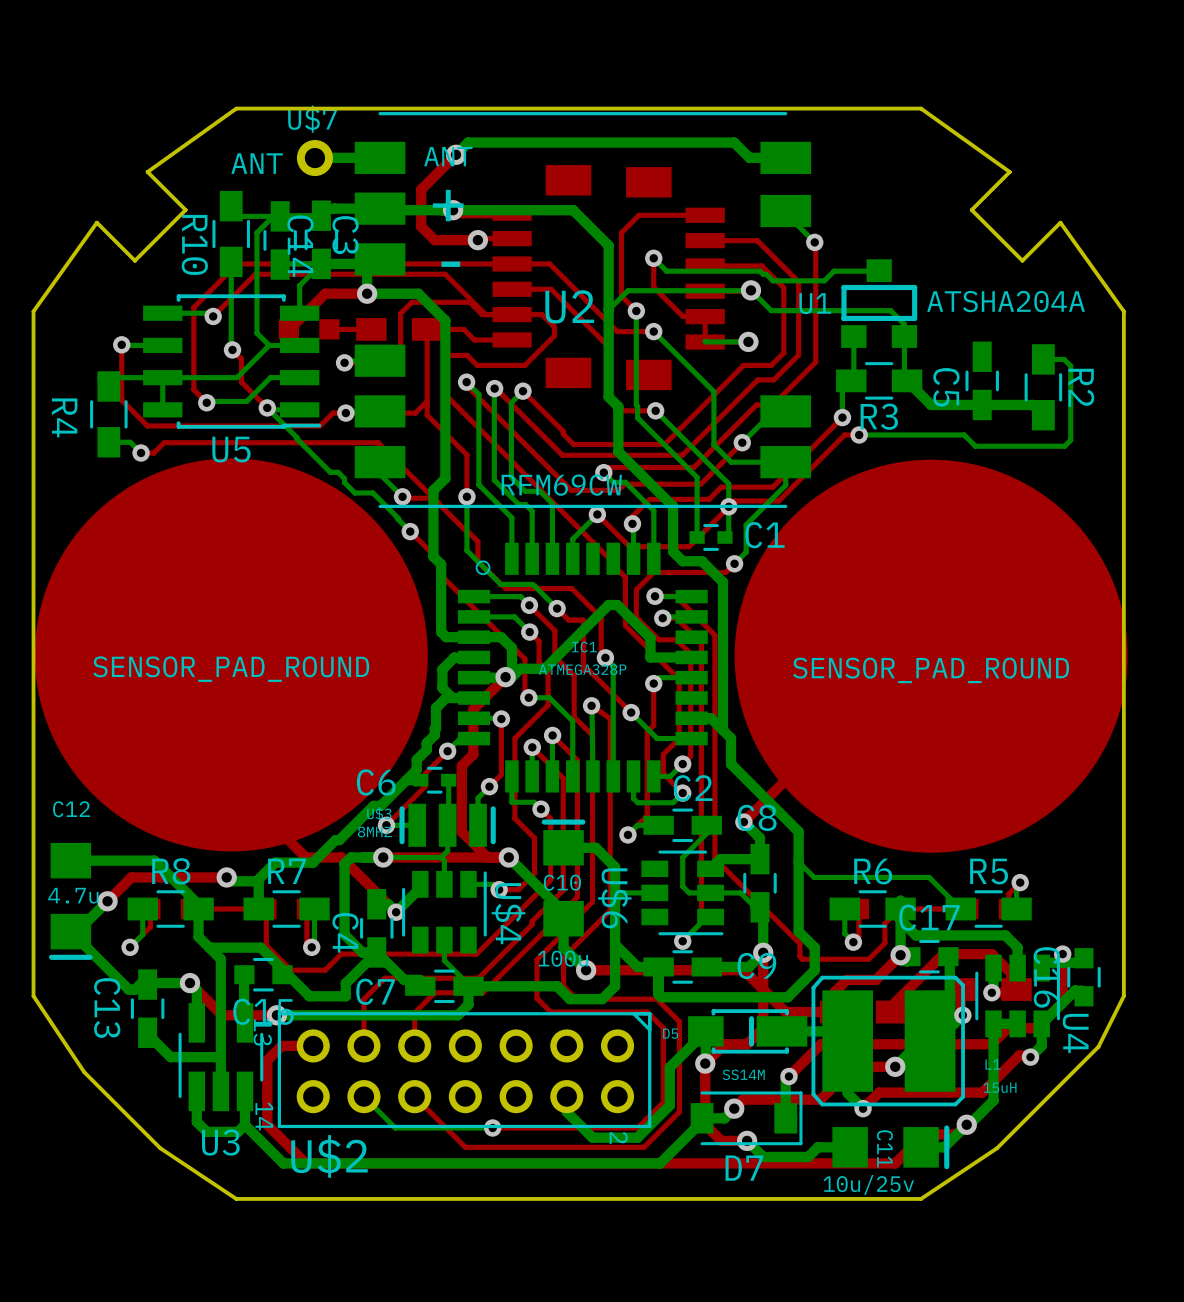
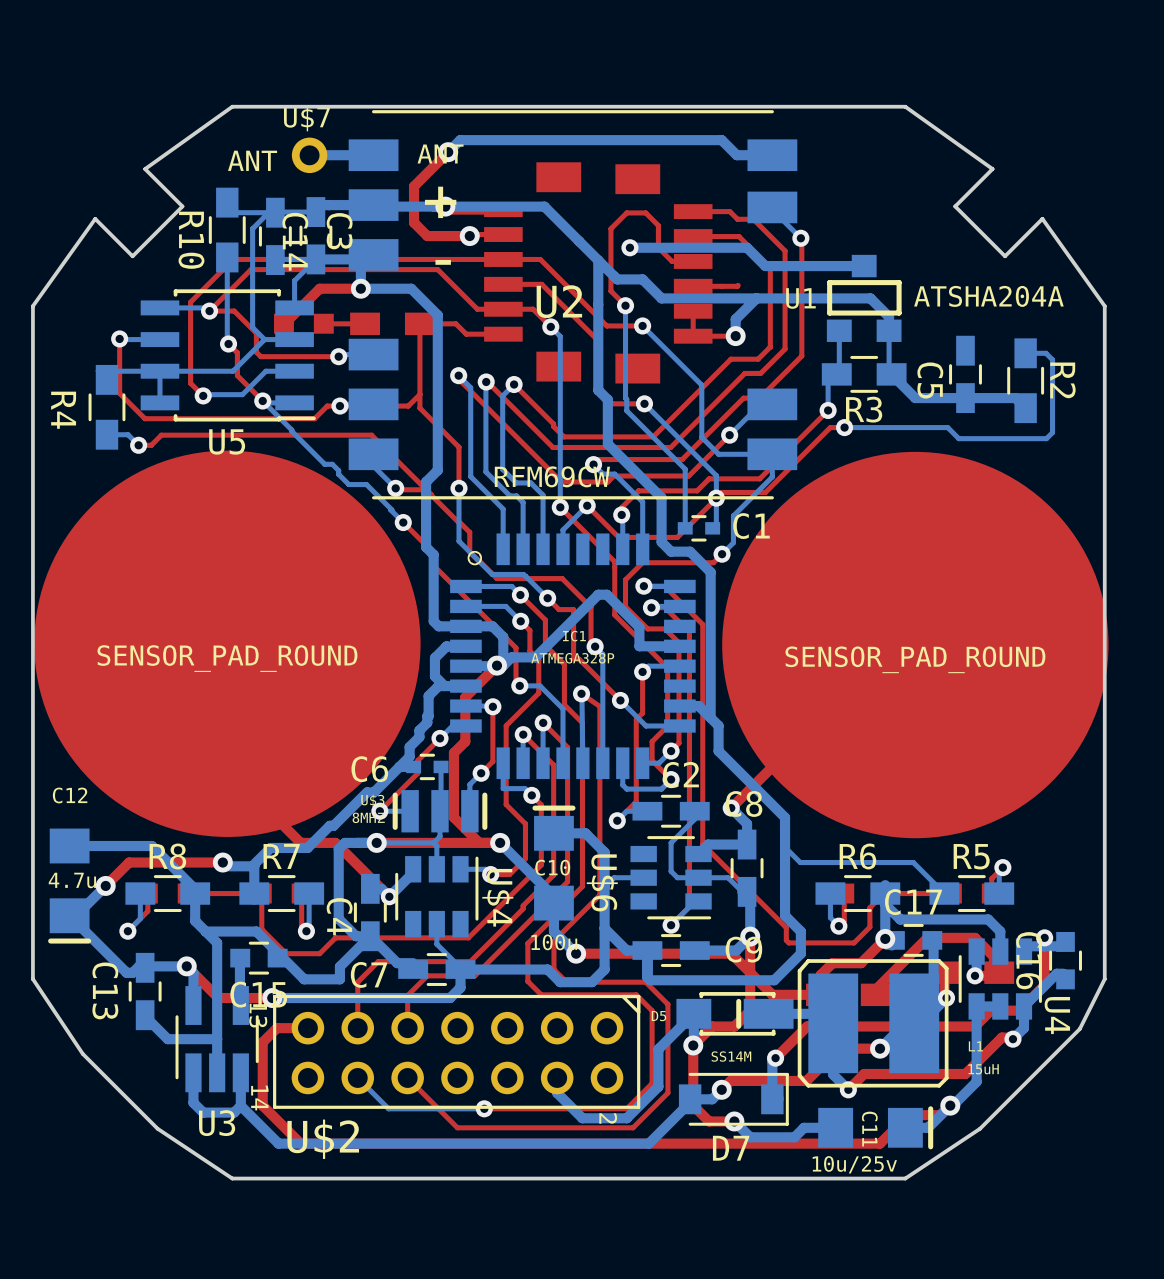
bottom track: (553, 210) (573, 210) (608, 245) (608, 268) -> none
top track: (705, 215) (637, 216) -> (693, 261) (672, 261) (658, 247) (658, 225) (645, 212) (626, 212)
top track: (751, 240) (757, 240) (798, 282) -> (693, 211) (729, 211) (737, 219) (753, 219) (785, 250) (785, 277)
bottom track: (653, 258) (666, 271) (760, 271) (772, 280) (824, 280) (834, 271) (879, 271) -> (629, 247) (747, 247) (765, 266) (864, 266)
top track: (653, 258) (653, 287) (682, 316) (705, 316) -> none
via position: (653, 258) -> (629, 247)
top track: (705, 265) (761, 265) (783, 287) (783, 352) -> (739, 236) (770, 267) (770, 347)
bottom track: (749, 290) (771, 310) (890, 310) (904, 324) -> (544, 206) (617, 279) (642, 279) (661, 298) (870, 298) (889, 318)
bottom track: (749, 290) (627, 290) (608, 310) -> none
via: (750, 290) -> none
top track: (485, 314) (482, 314) (469, 302) (411, 302) (400, 313) (400, 348) (385, 362) (344, 362) -> (209, 311) (234, 311) (256, 333) (256, 352) (260, 356) (338, 356)
top track: (542, 314) (554, 327) (554, 335) (524, 365) (477, 365) (467, 355) (448, 355) (444, 359) (444, 393) (615, 564) (615, 567) (625, 577) -> (560, 507) (614, 561) (614, 567)
top track: none -> (533, 309) (550, 326)
bottom track: none -> (550, 326) (560, 336) (560, 507)
via: none -> (550, 326)
bottom track: (704, 341) (748, 341) -> (756, 298) (735, 319) (735, 336)
via: none -> (560, 507)

